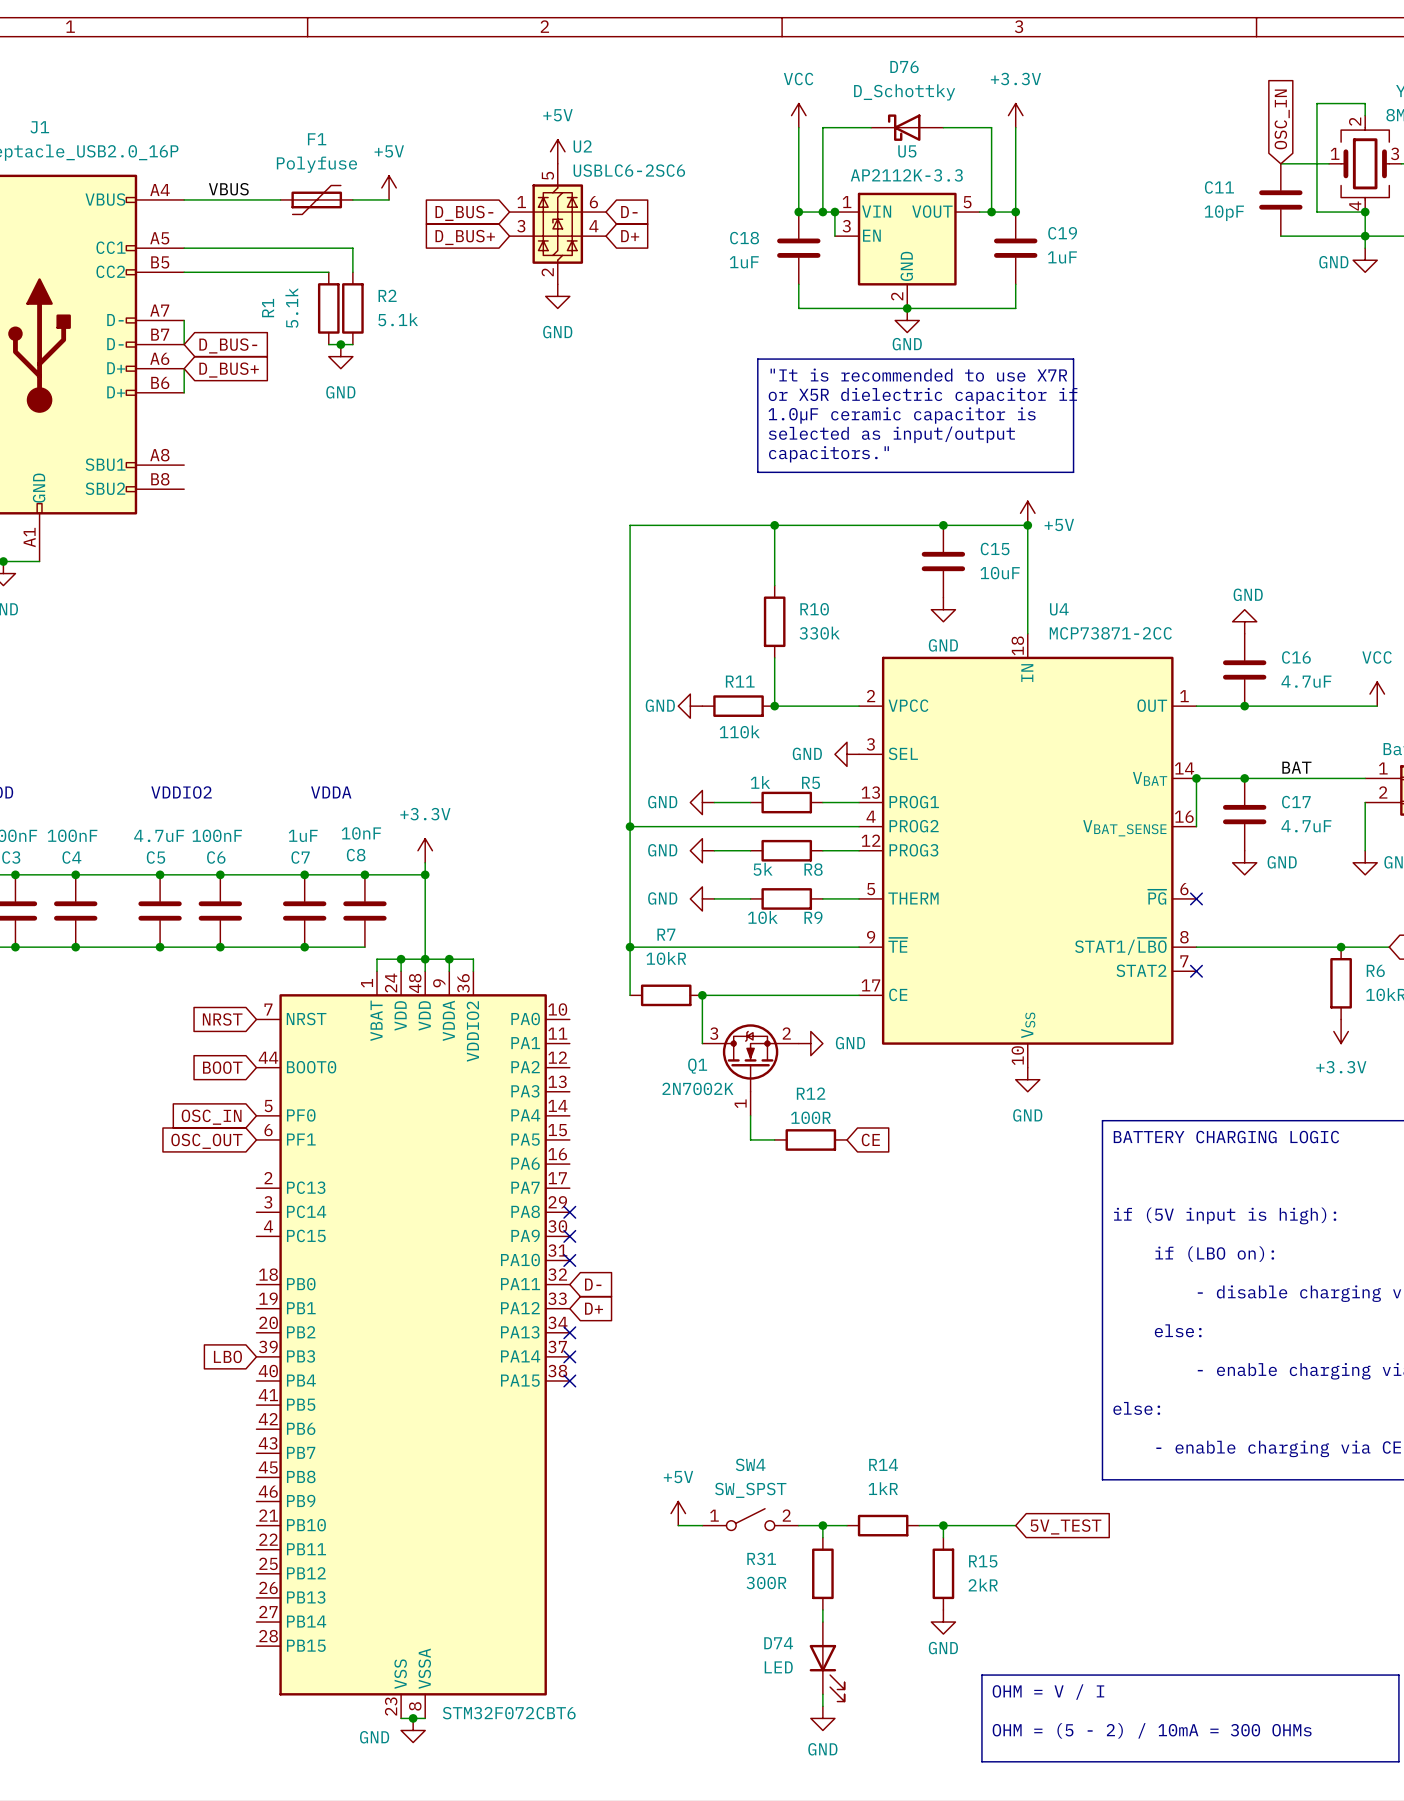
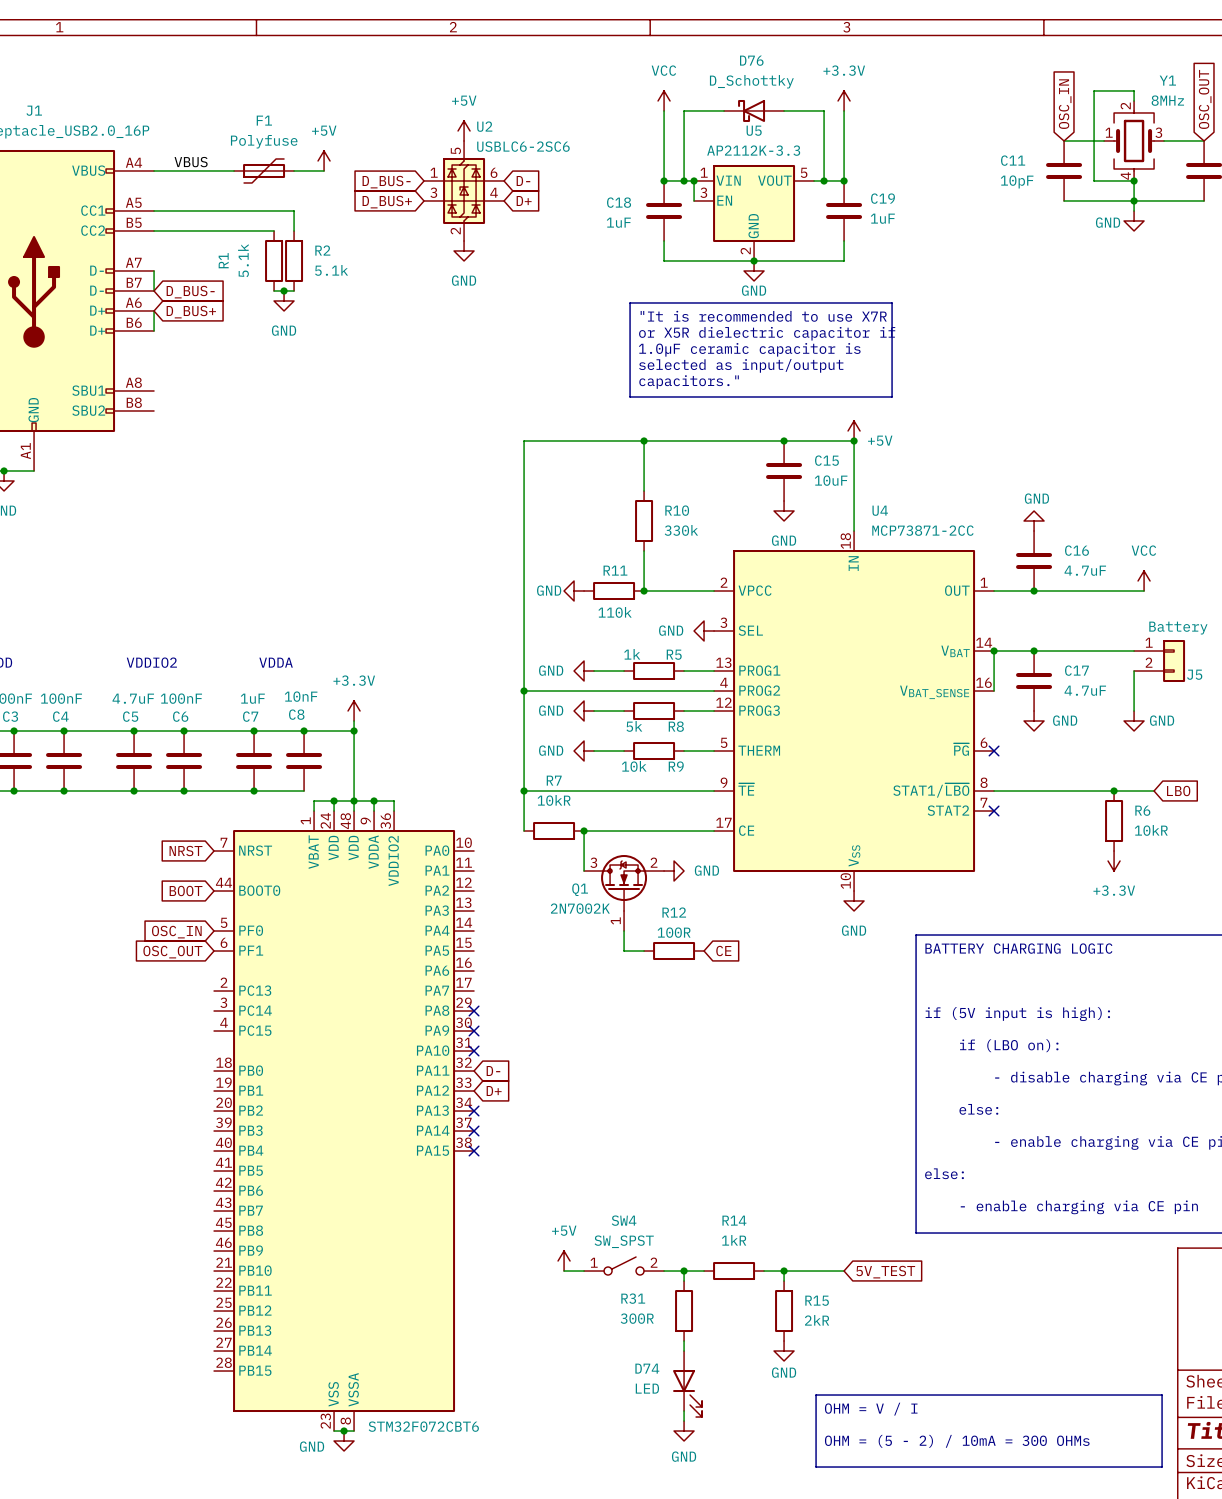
label: BAT (1296, 767) -> none
global label: LBO (227, 1356) -> none

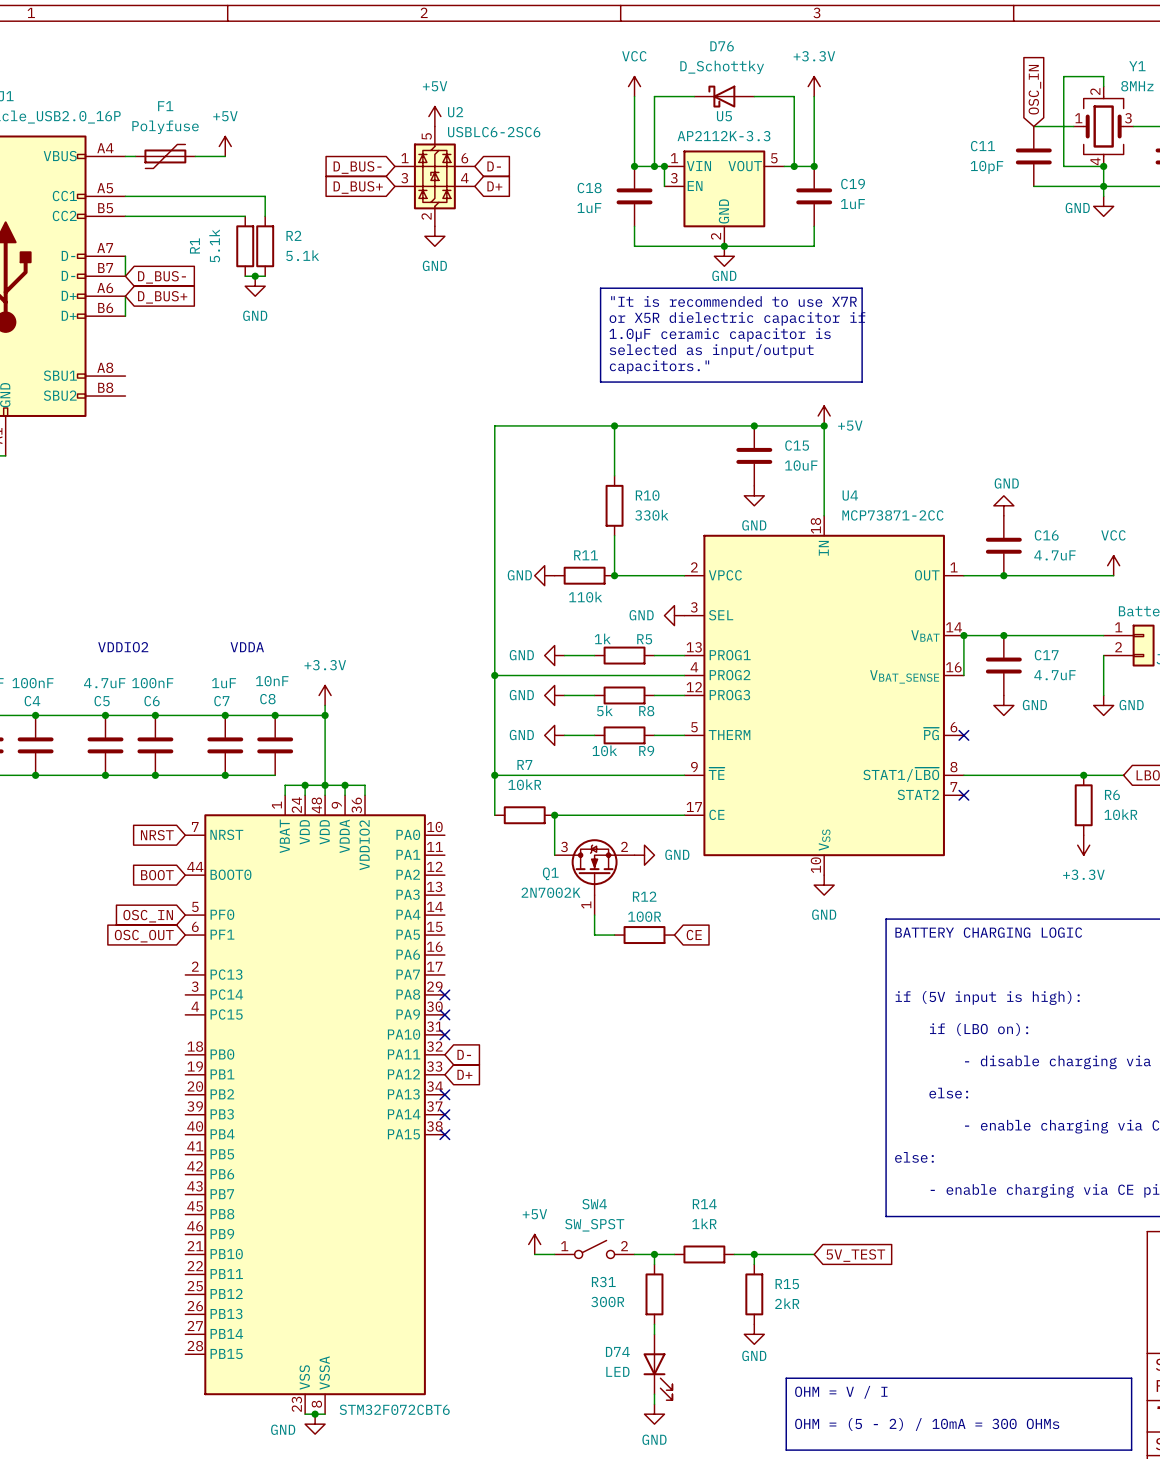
power symbol position: +5V (324, 160) -> +5V (225, 146)
label: VBUS (191, 162) -> none
F1 position: (264, 170) -> (165, 156)
wire: (294, 170) (324, 170) -> none

